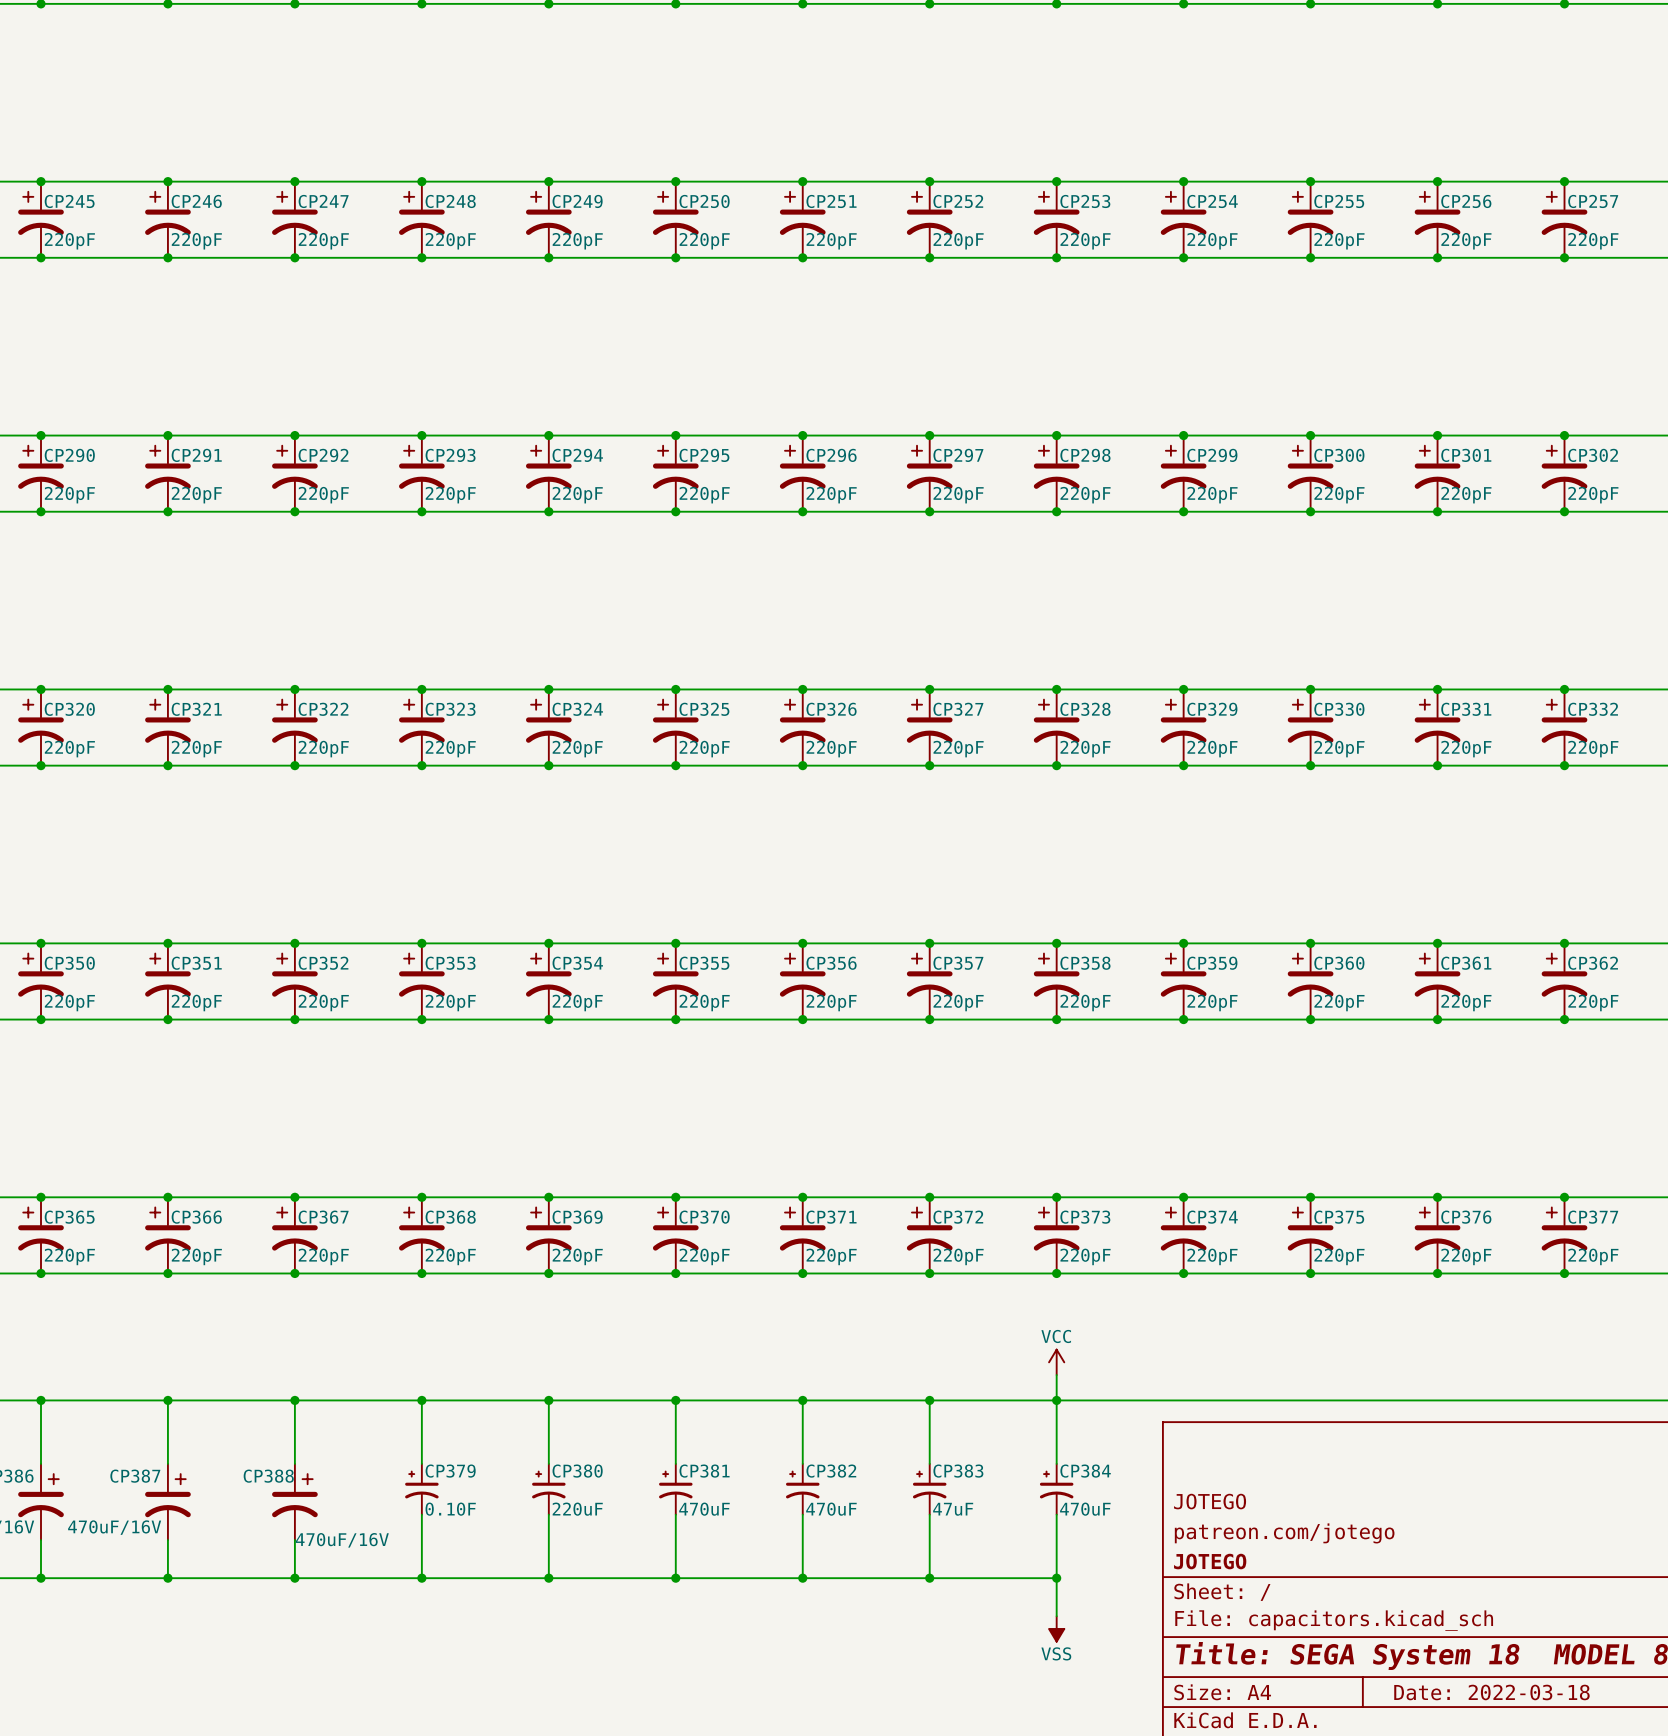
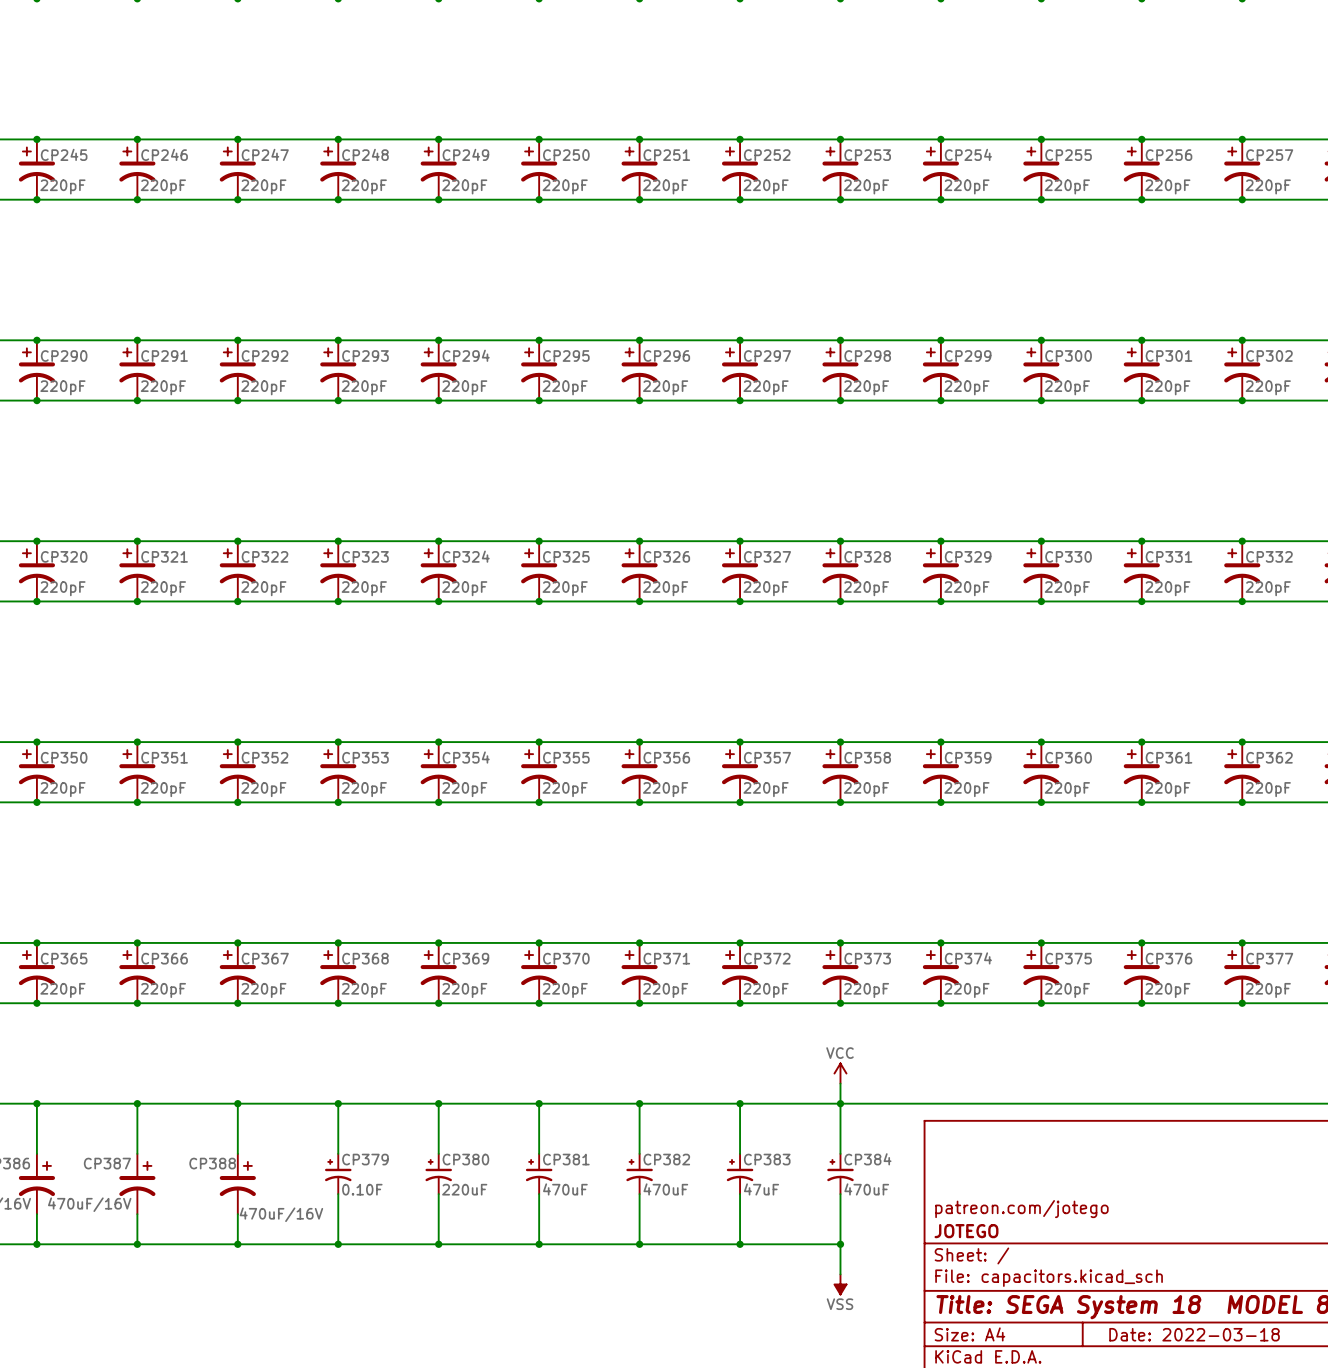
title block: JOTEGO (1210, 1501) -> none

